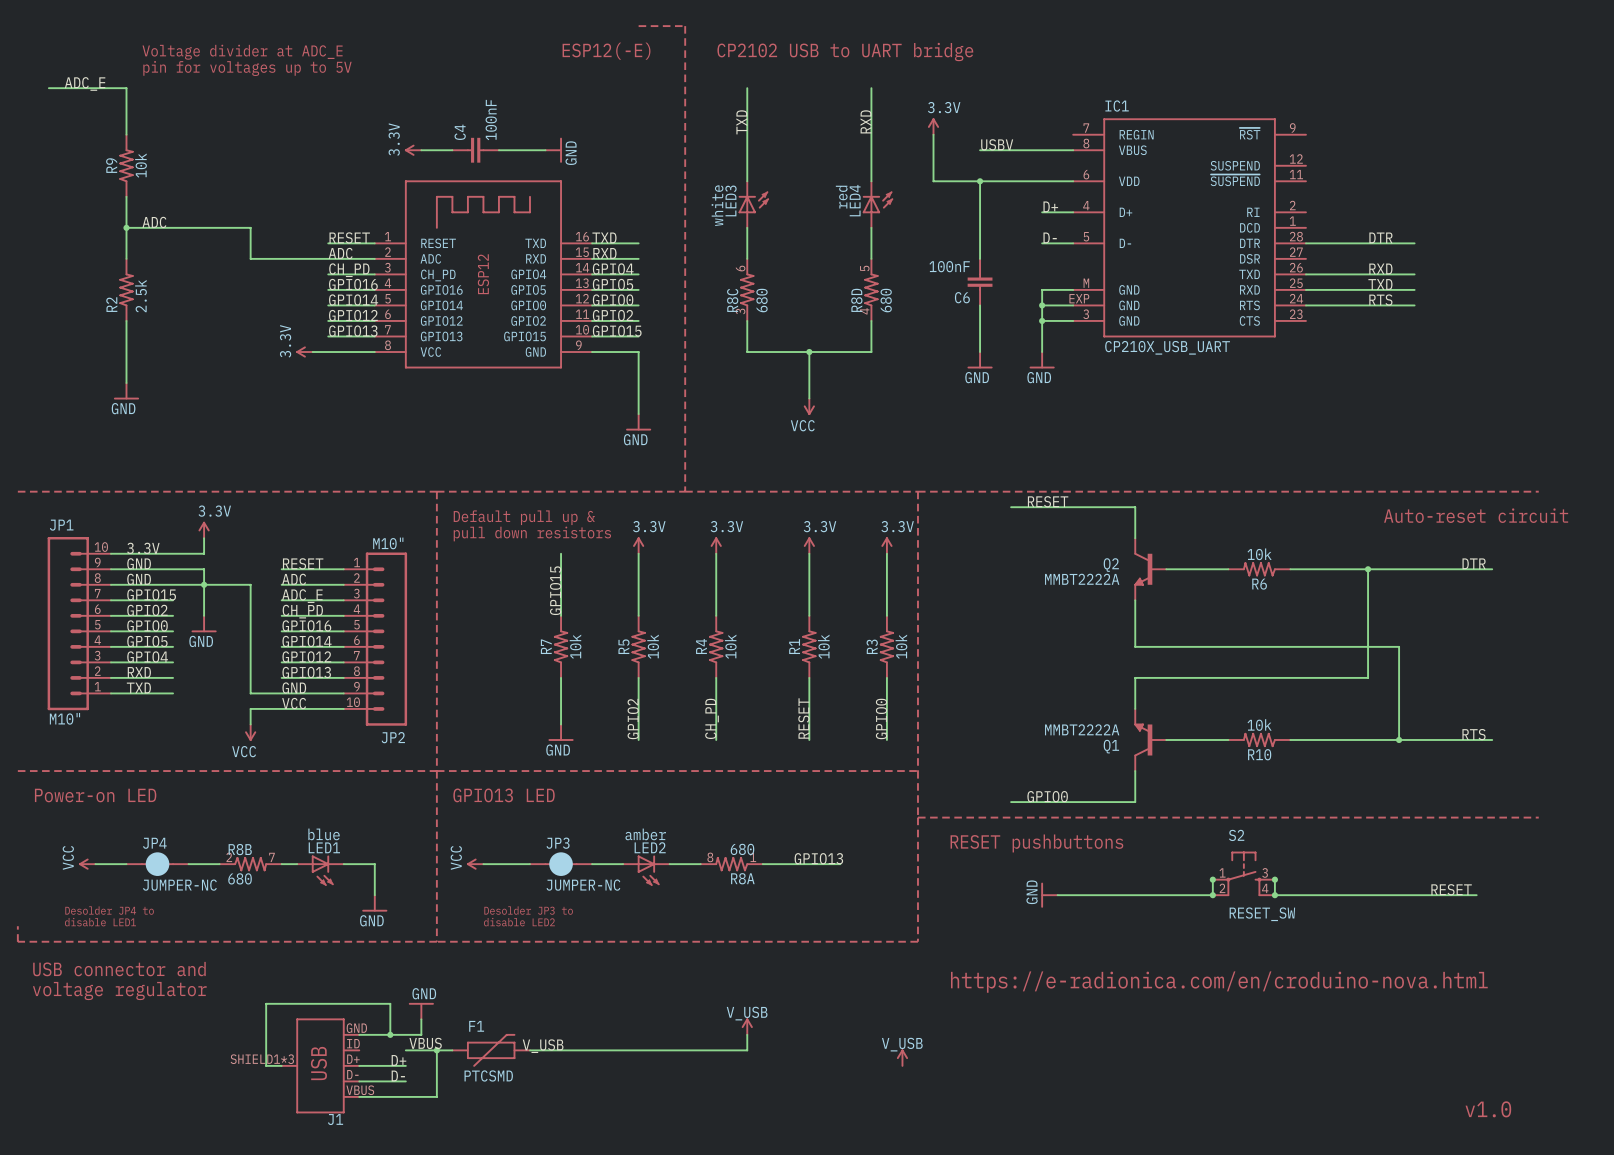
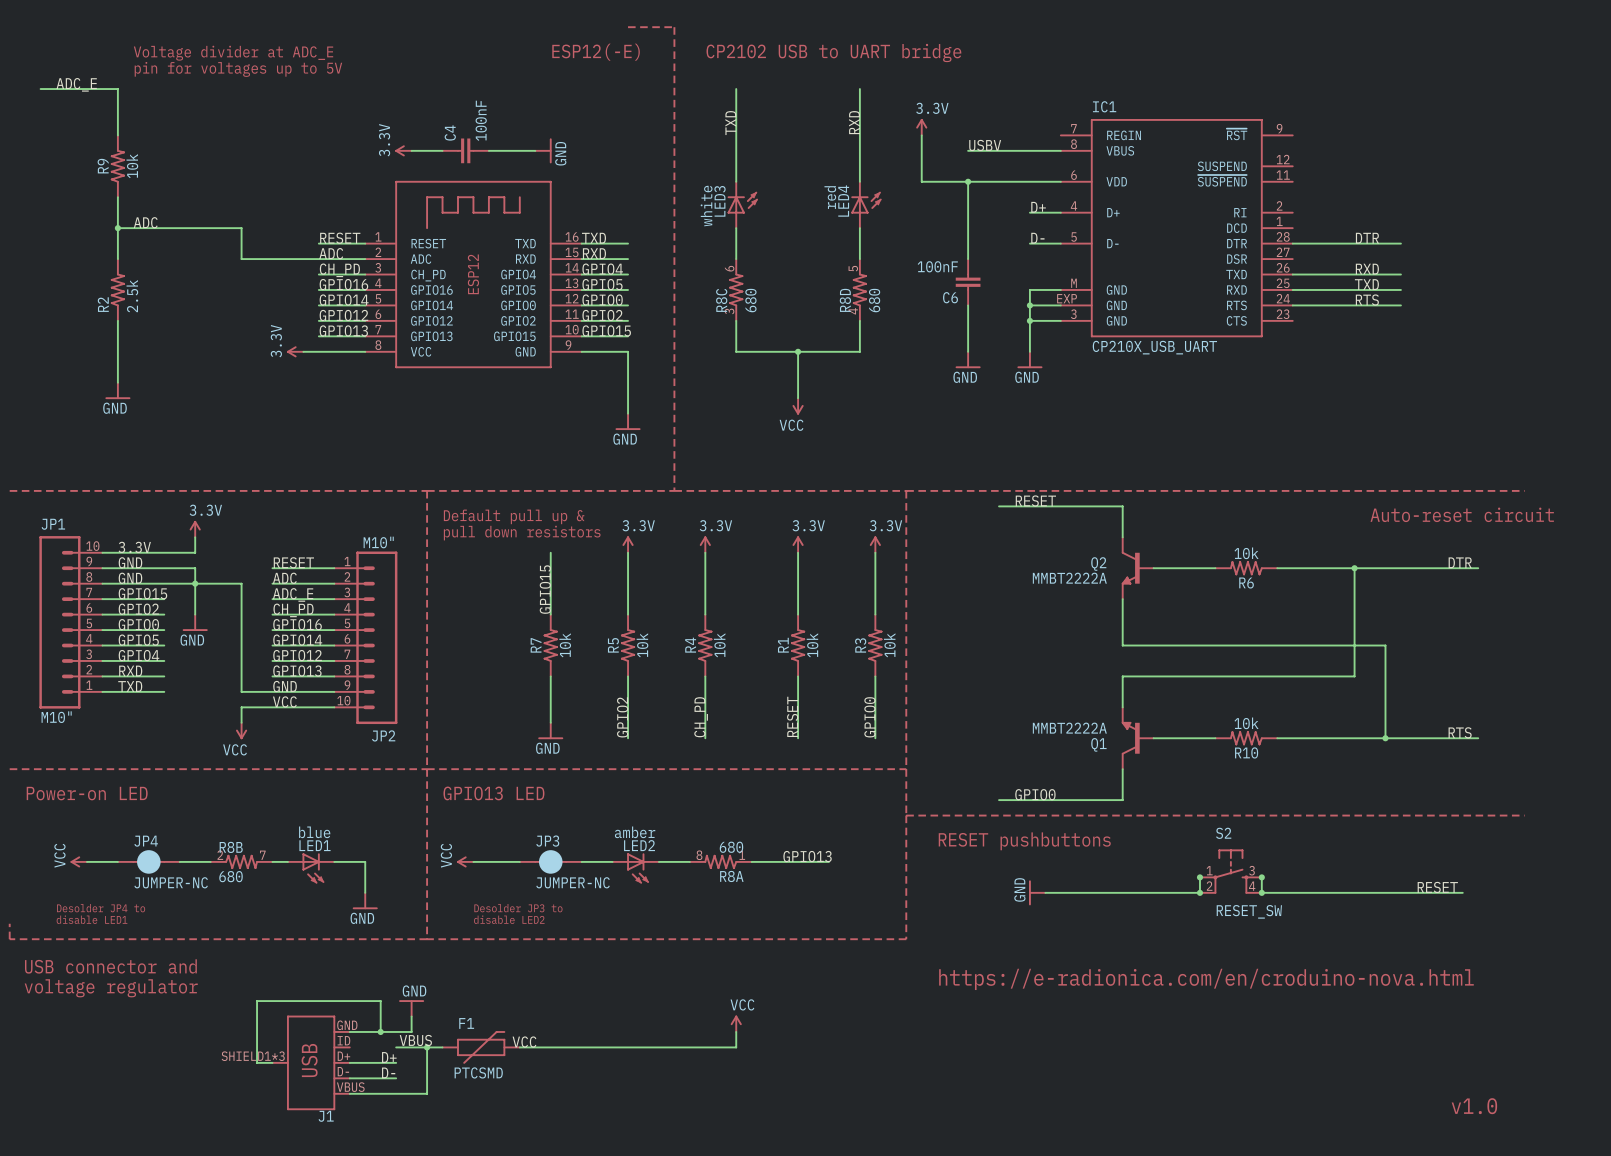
power symbol: V_USB (747, 1026) -> VCC (736, 1023)
label: V_USB (543, 1046) -> VCC (524, 1042)
power symbol: V_USB (902, 1057) -> none

